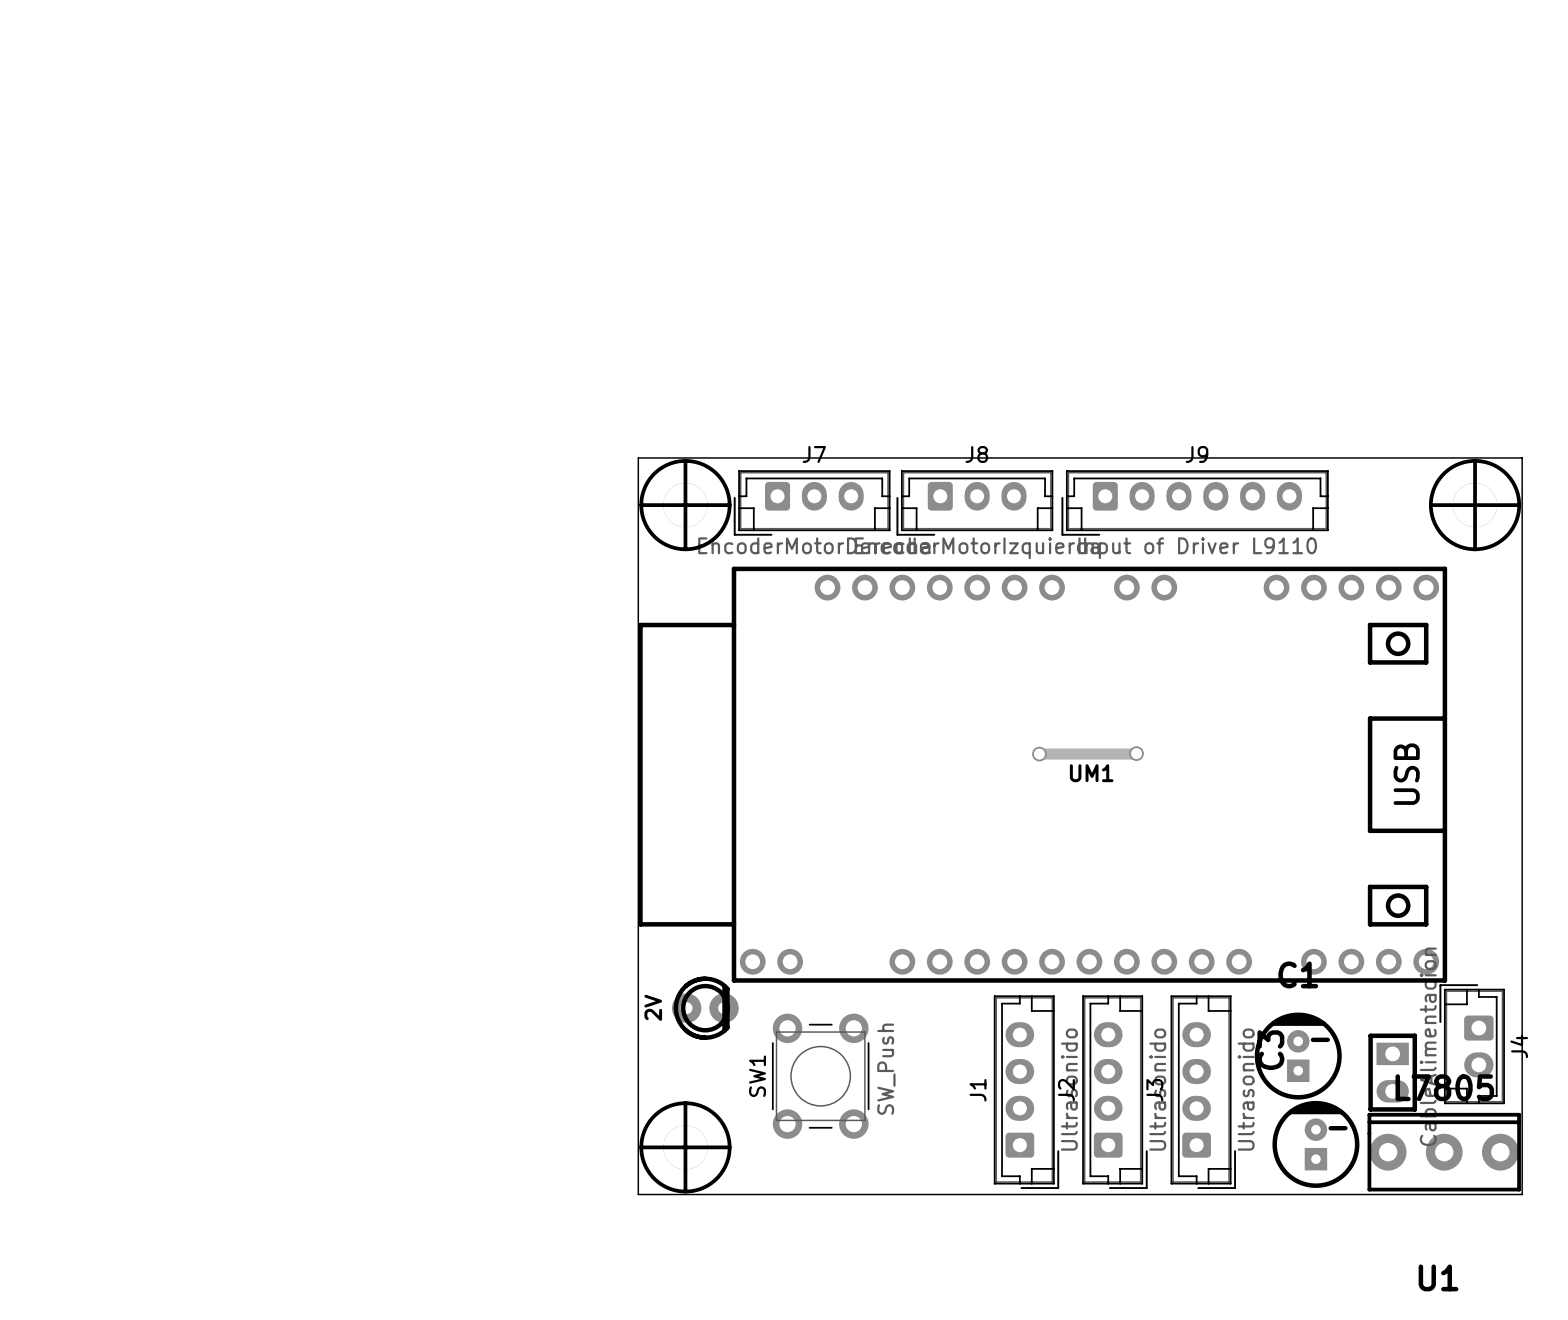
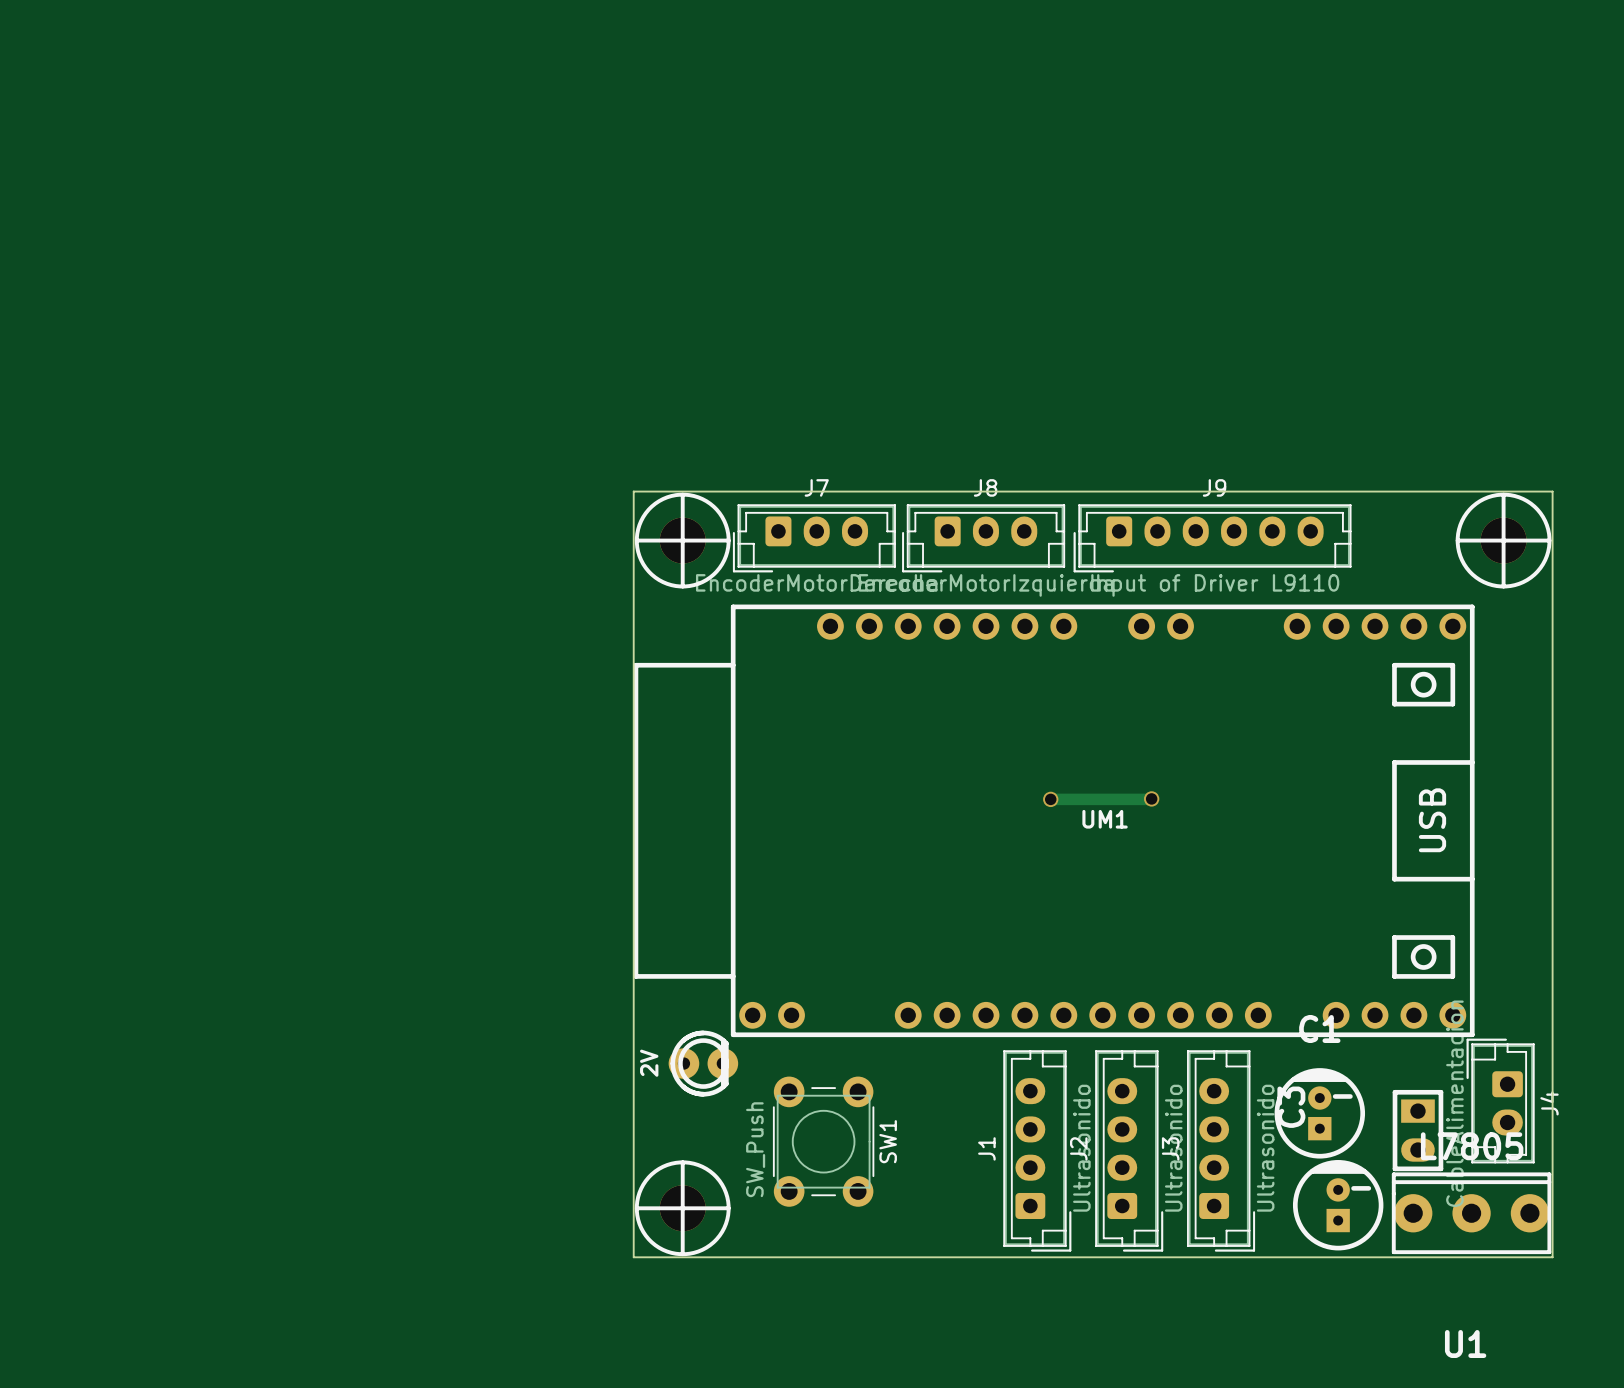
SW1 rotation: 0° (820, 1076) -> 180° (823, 1141)

